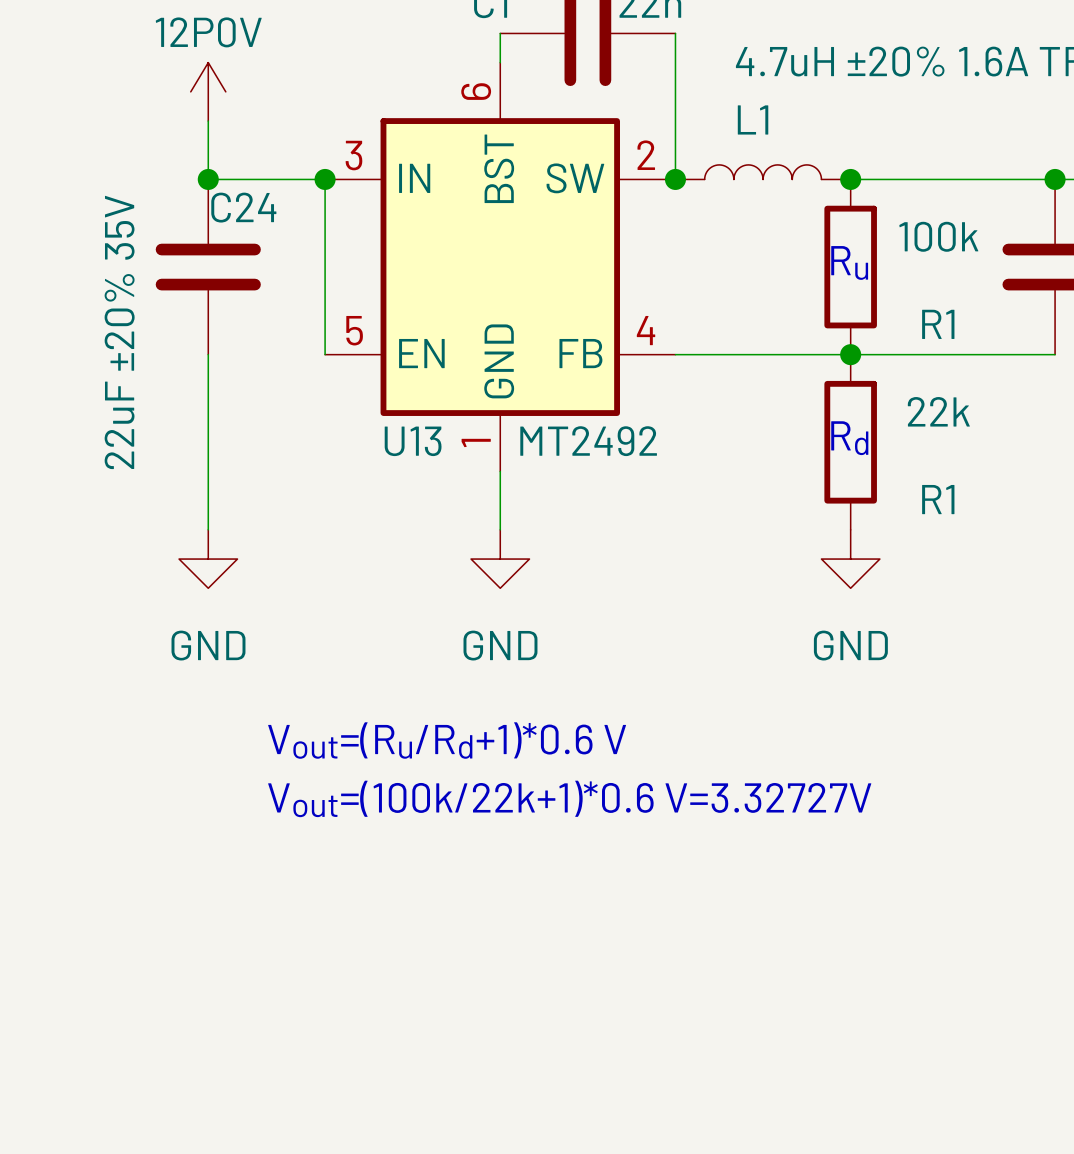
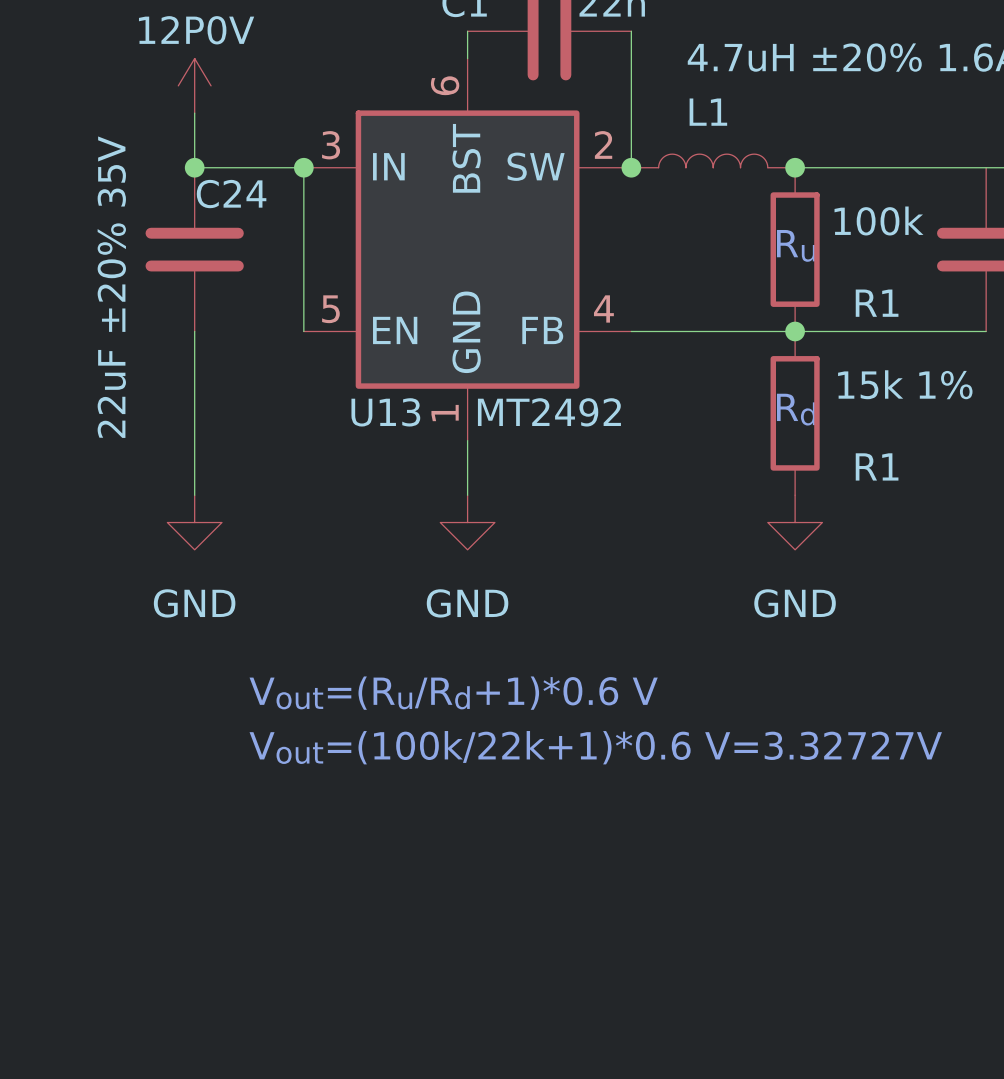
junction: (1055, 179) -> none
R1 value: 22k (938, 411) -> 15k 1% (905, 384)

